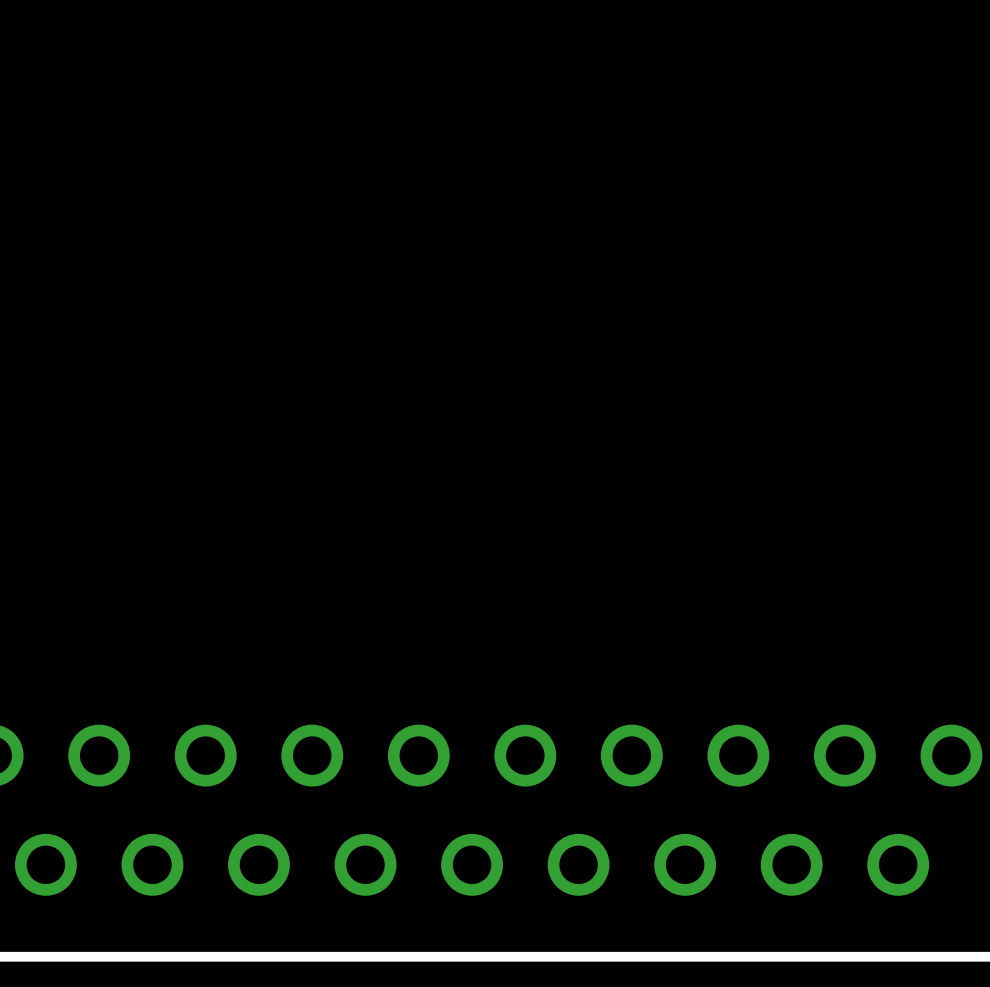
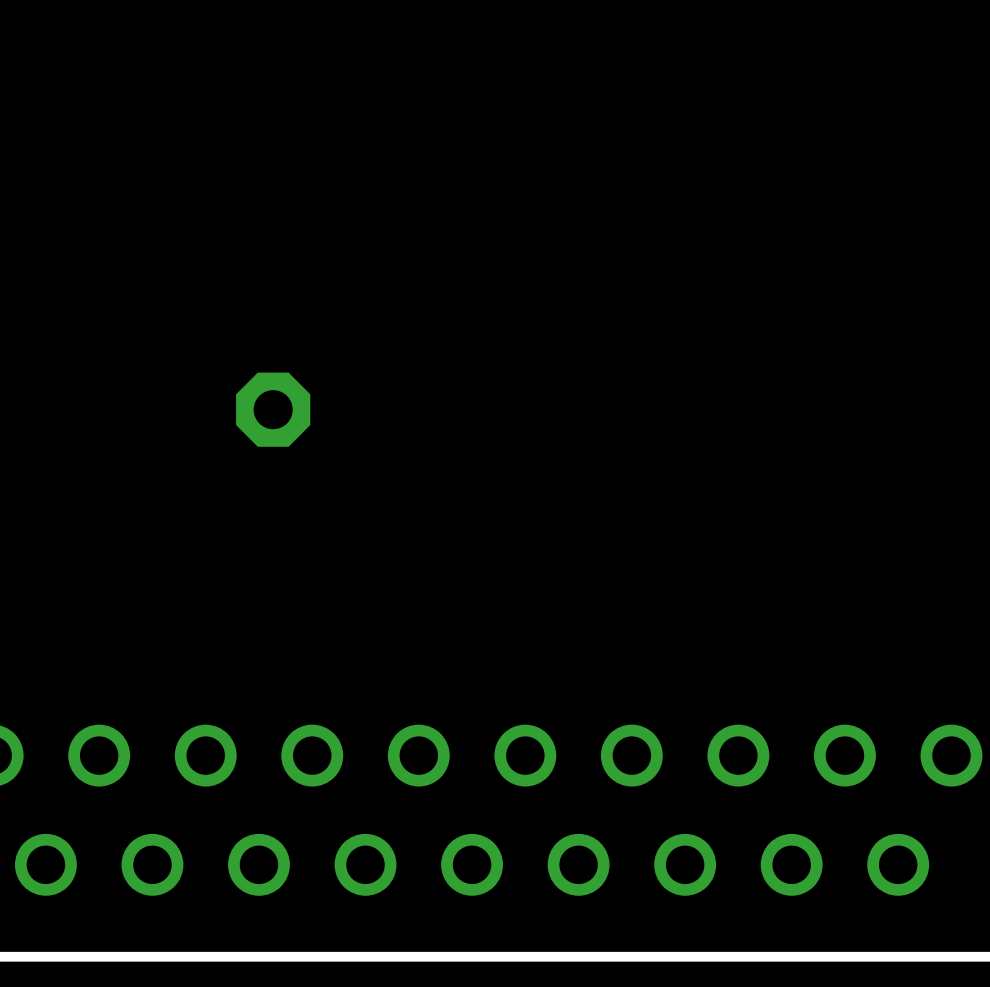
part: none -> (273, 409)

